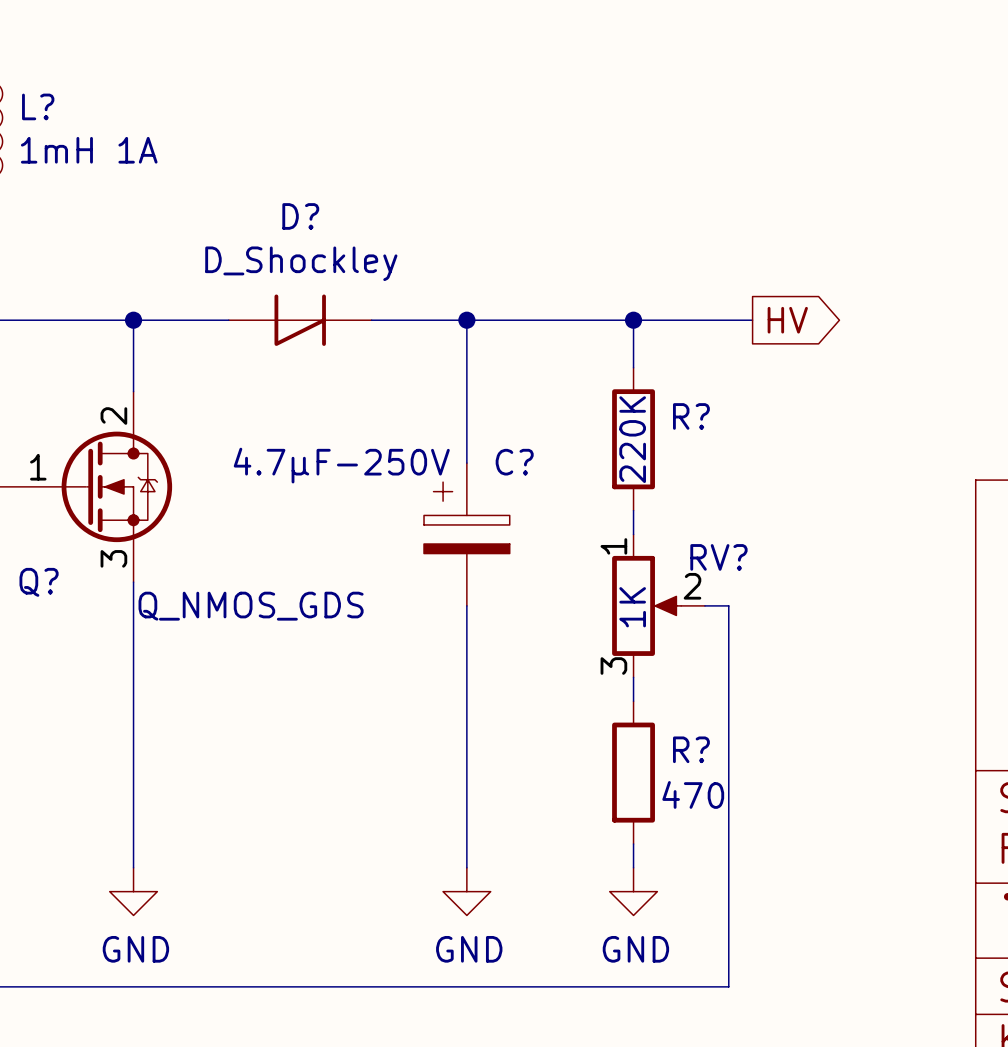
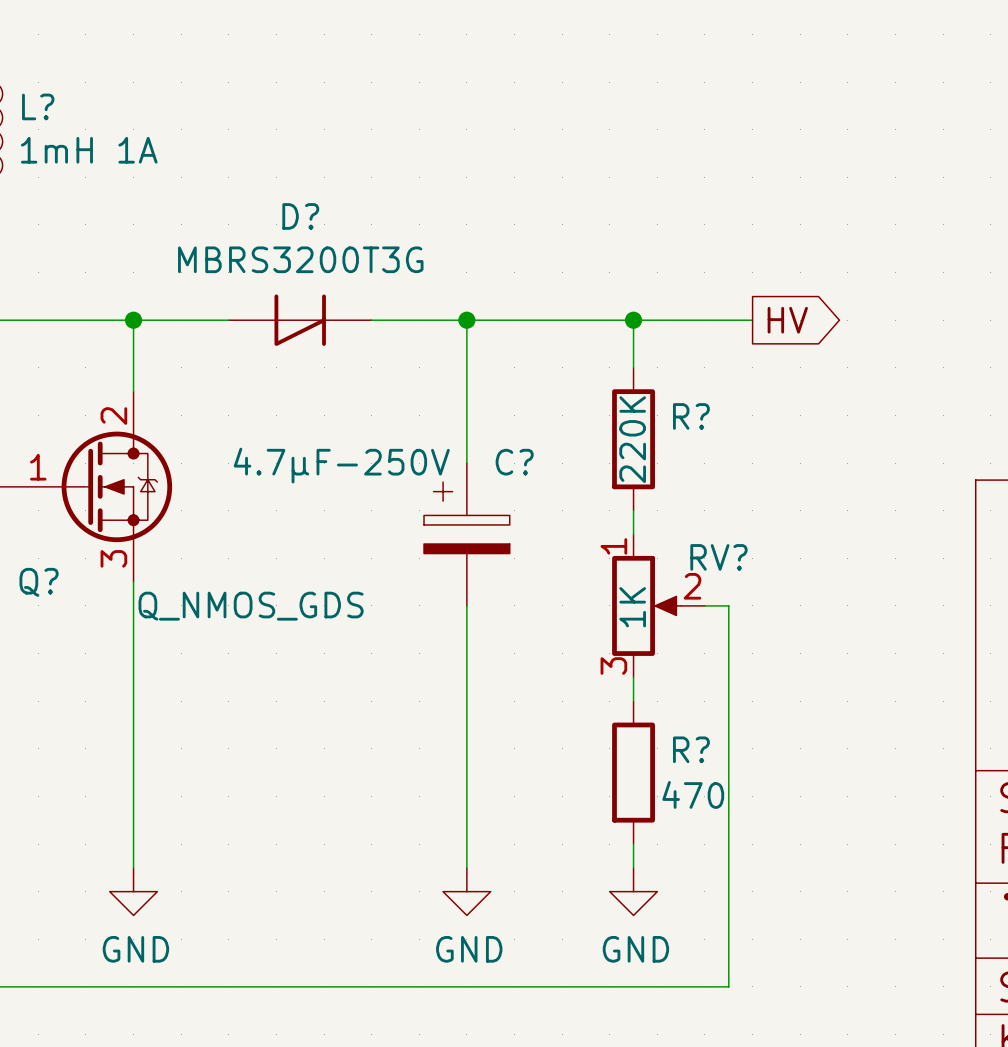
D? value: D_Shockley (301, 263) -> MBRS3200T3G (300, 259)

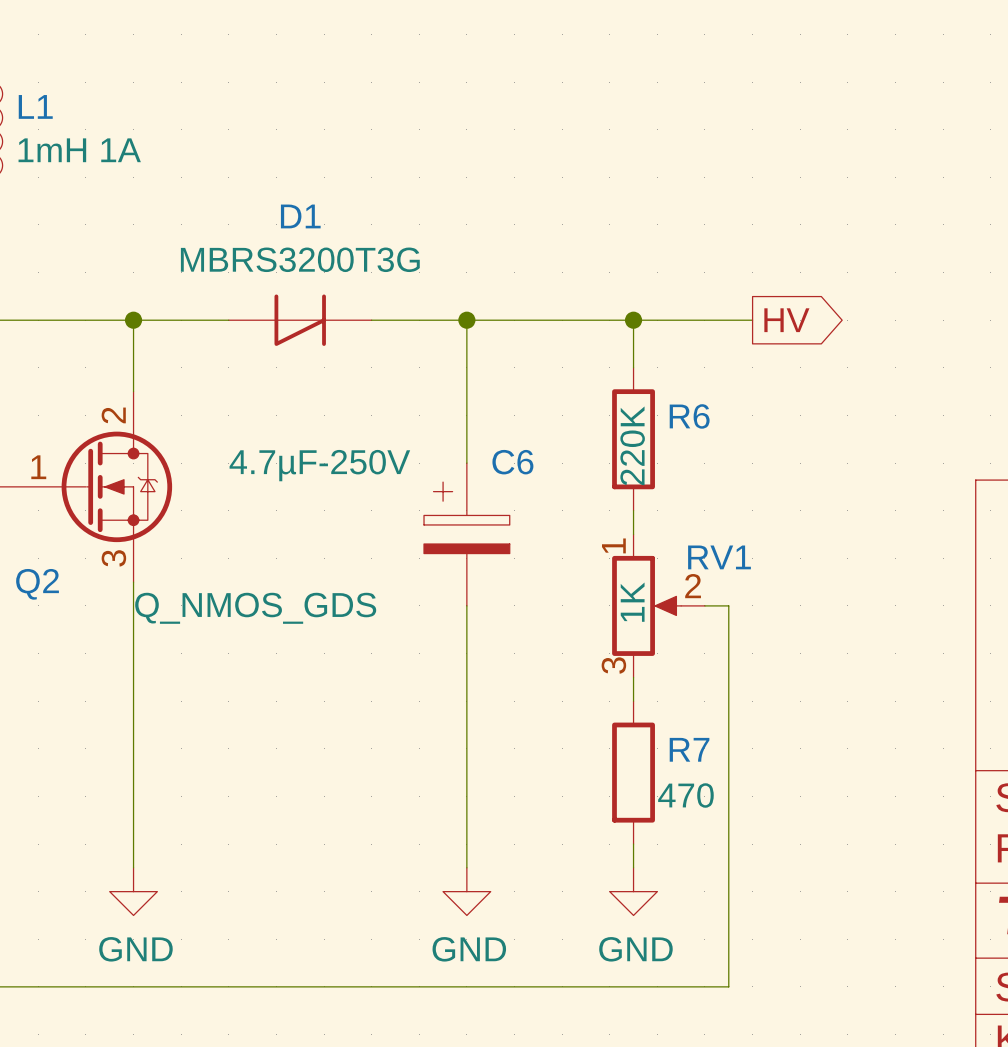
L? name: L? (38, 106) -> L1 (35, 106)
D? name: D? (300, 216) -> D1 (300, 216)
R? name: R? (691, 416) -> R6 (689, 416)
C? name: C? (514, 462) -> C6 (512, 462)
RV? name: RV? (718, 557) -> RV1 (719, 557)
Q? name: Q? (39, 582) -> Q2 (37, 584)
R? name: R? (691, 749) -> R7 (689, 749)

